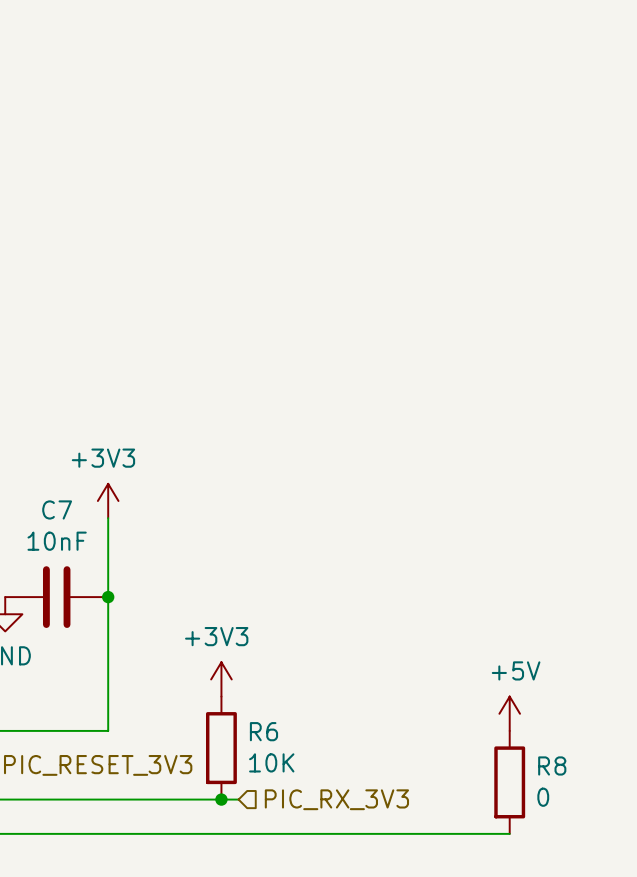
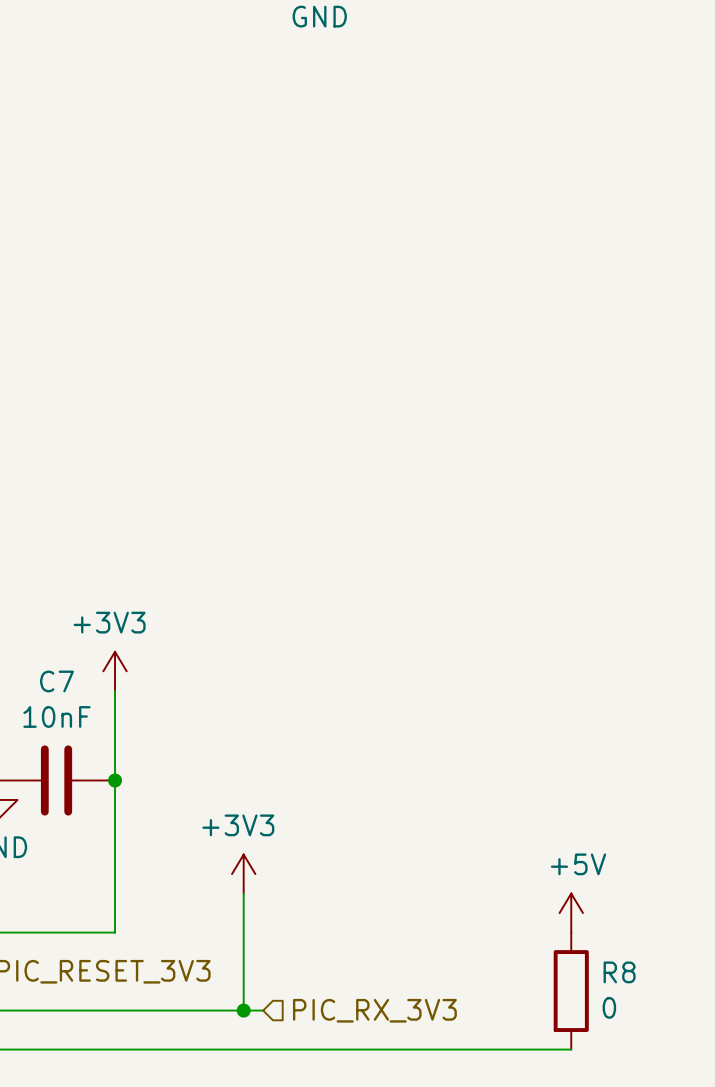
wire: none -> (243, 893) (243, 1010)
R6: 10K (221, 748) -> none

